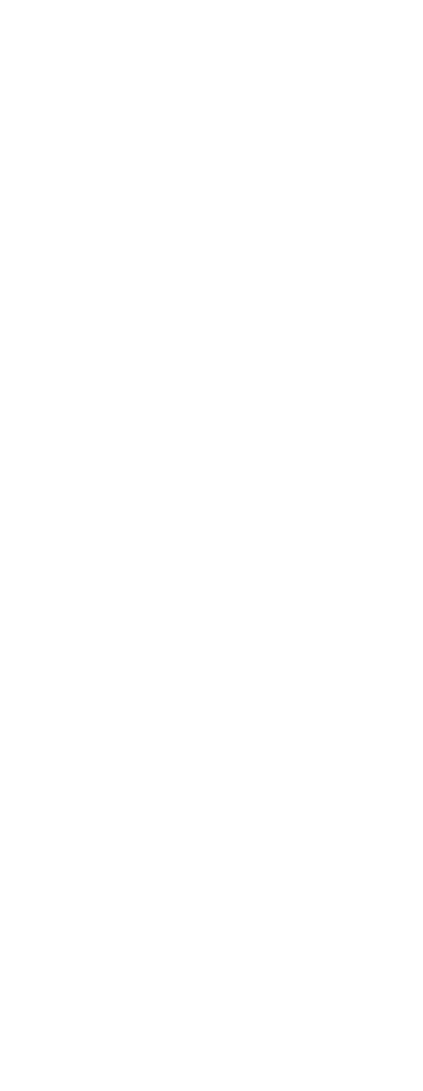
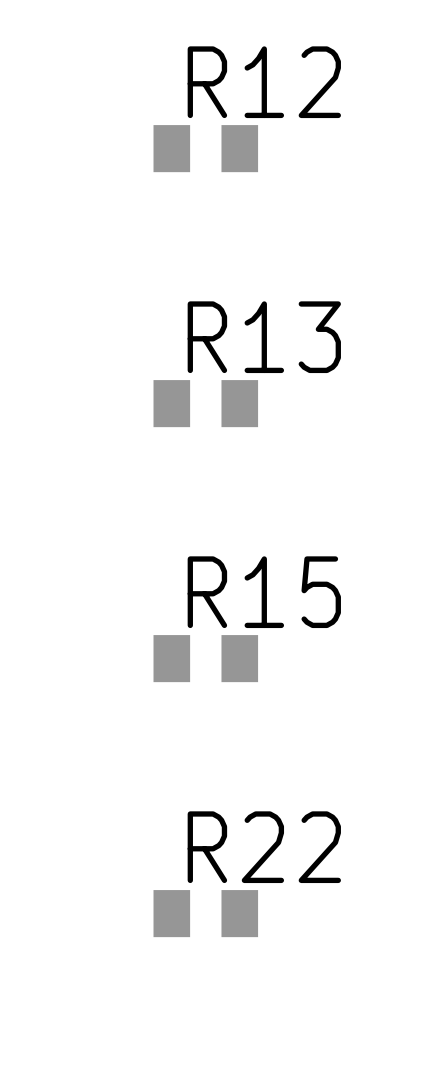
R12: none -> (205, 148)
R13: none -> (205, 403)
R15: none -> (205, 658)
R22: none -> (205, 913)

